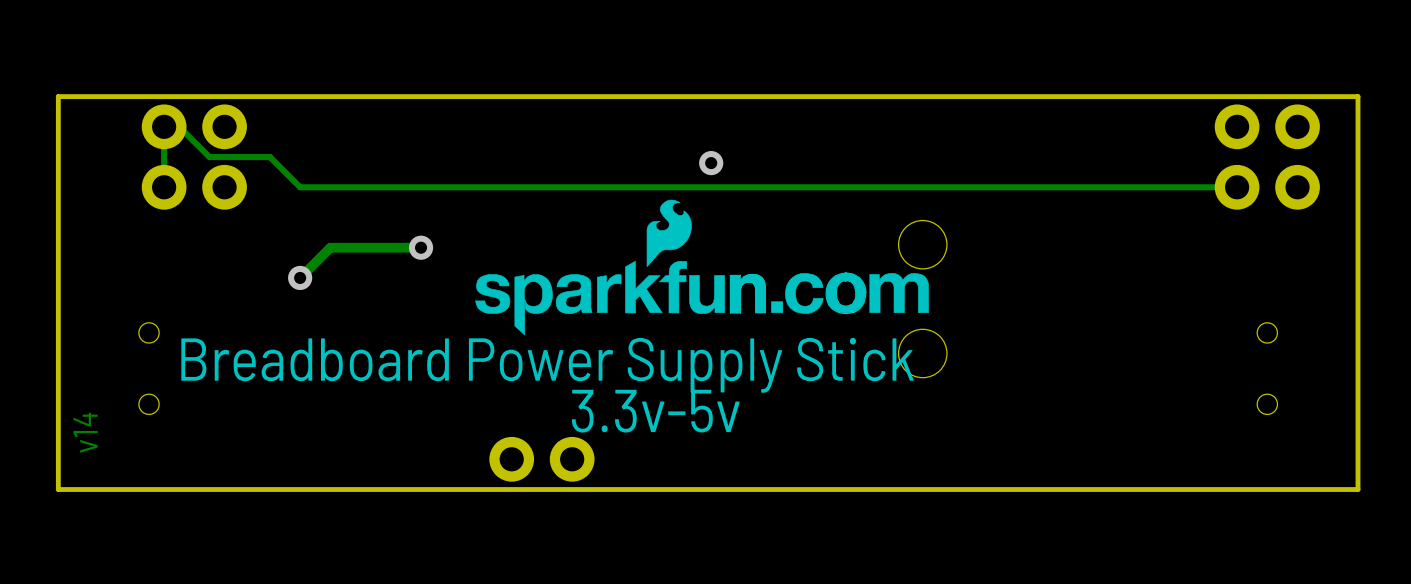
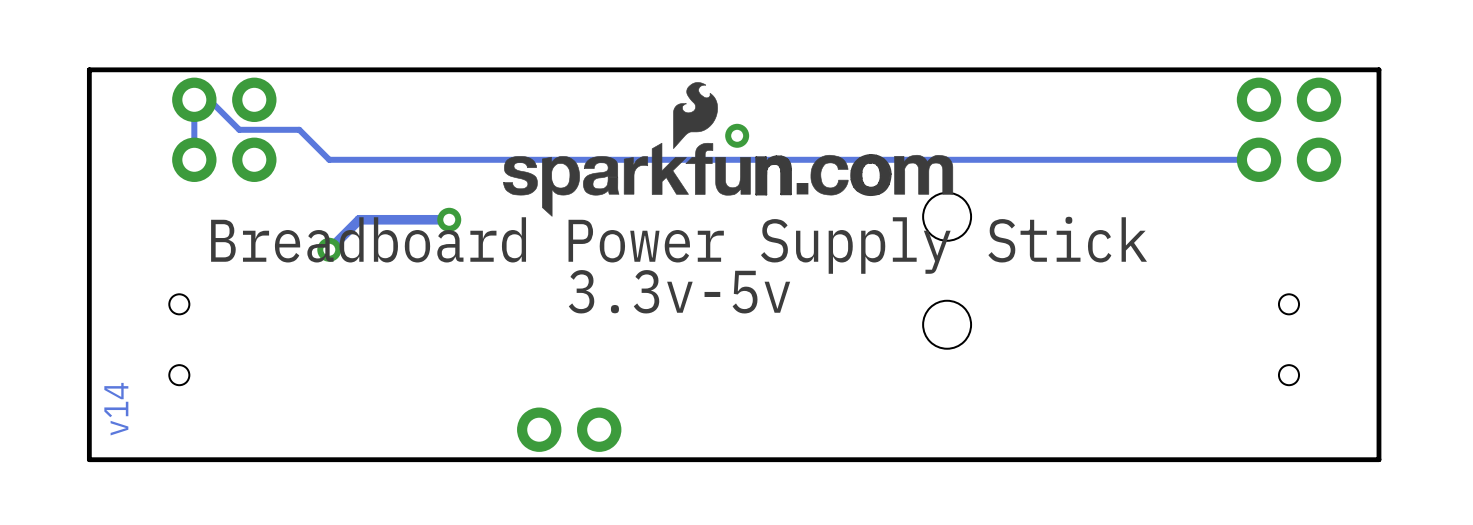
drawing position: (702, 267) -> (728, 149)
text position: Breadboard Power Supply Stick (547, 365) -> Breadboard Power Supply Stick (679, 245)
text position: 3.3v-5v (655, 411) -> 3.3v-5v (679, 291)

